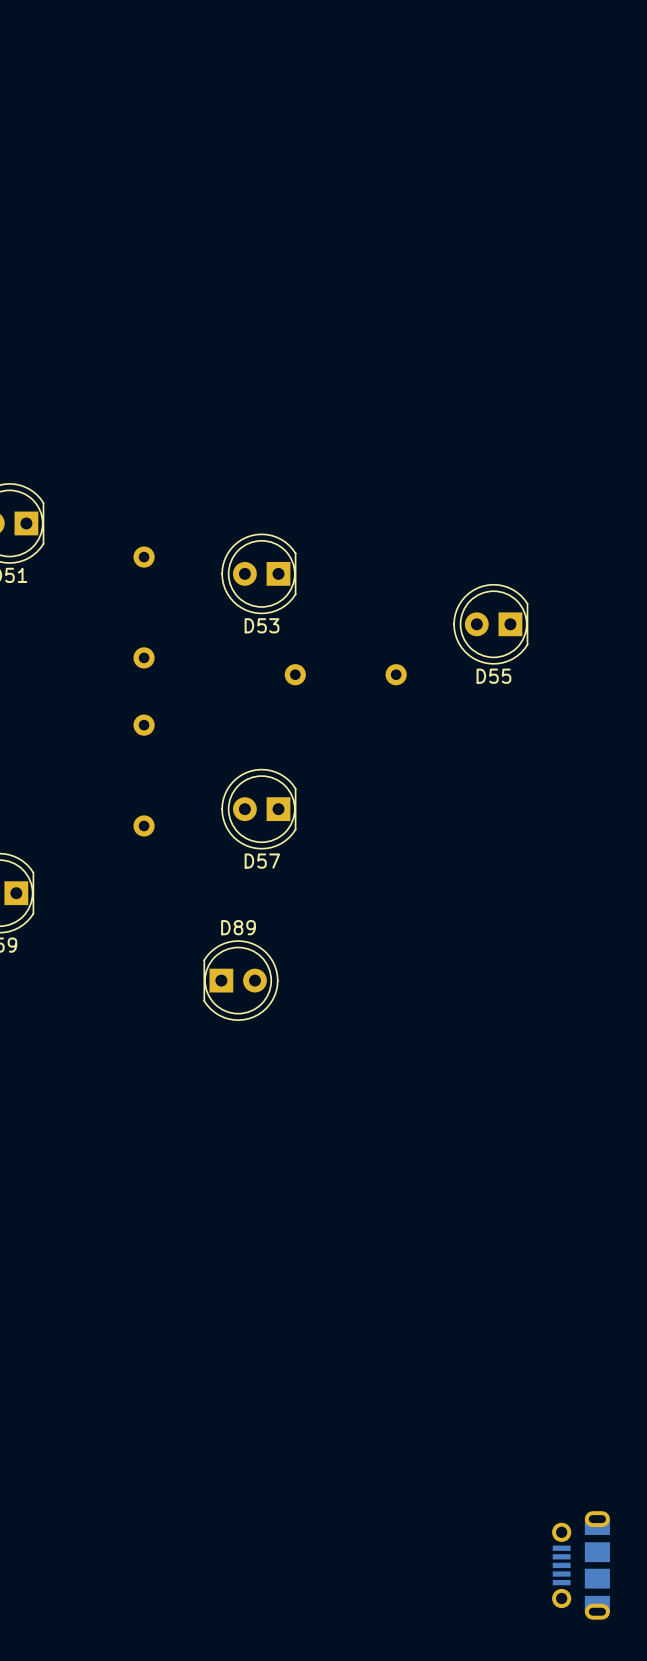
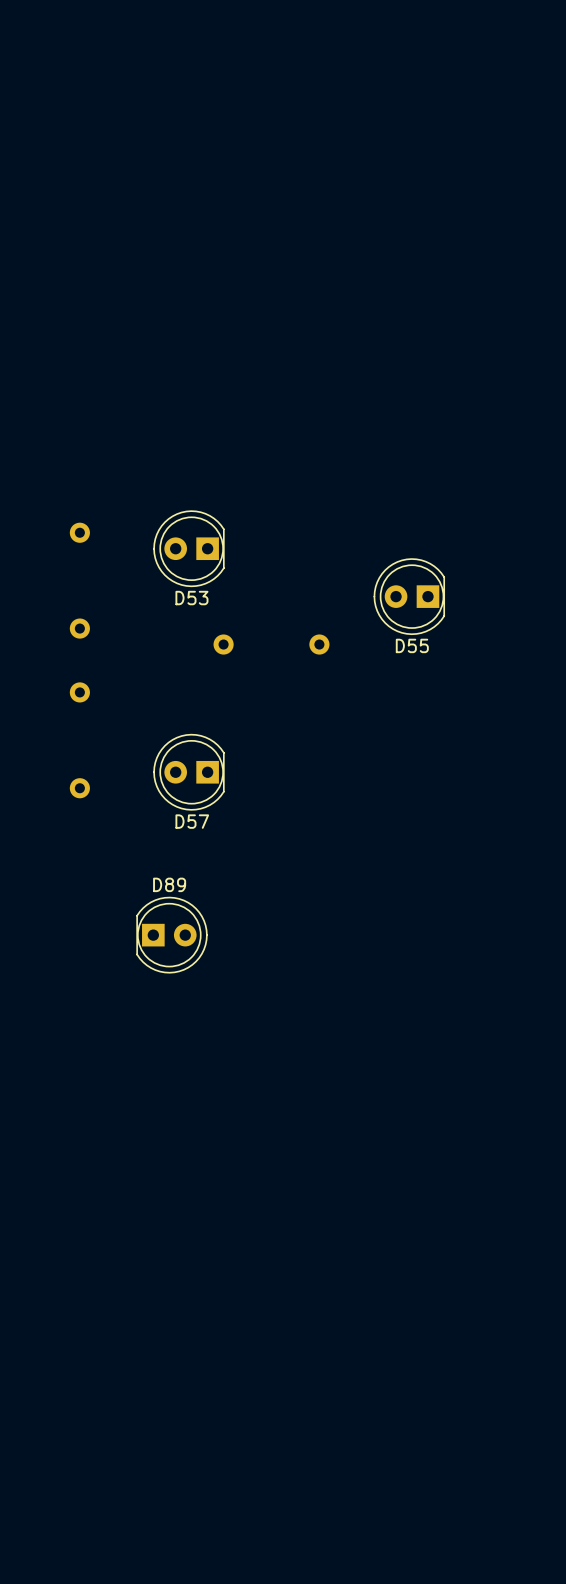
part: (581, 1565) -> none

